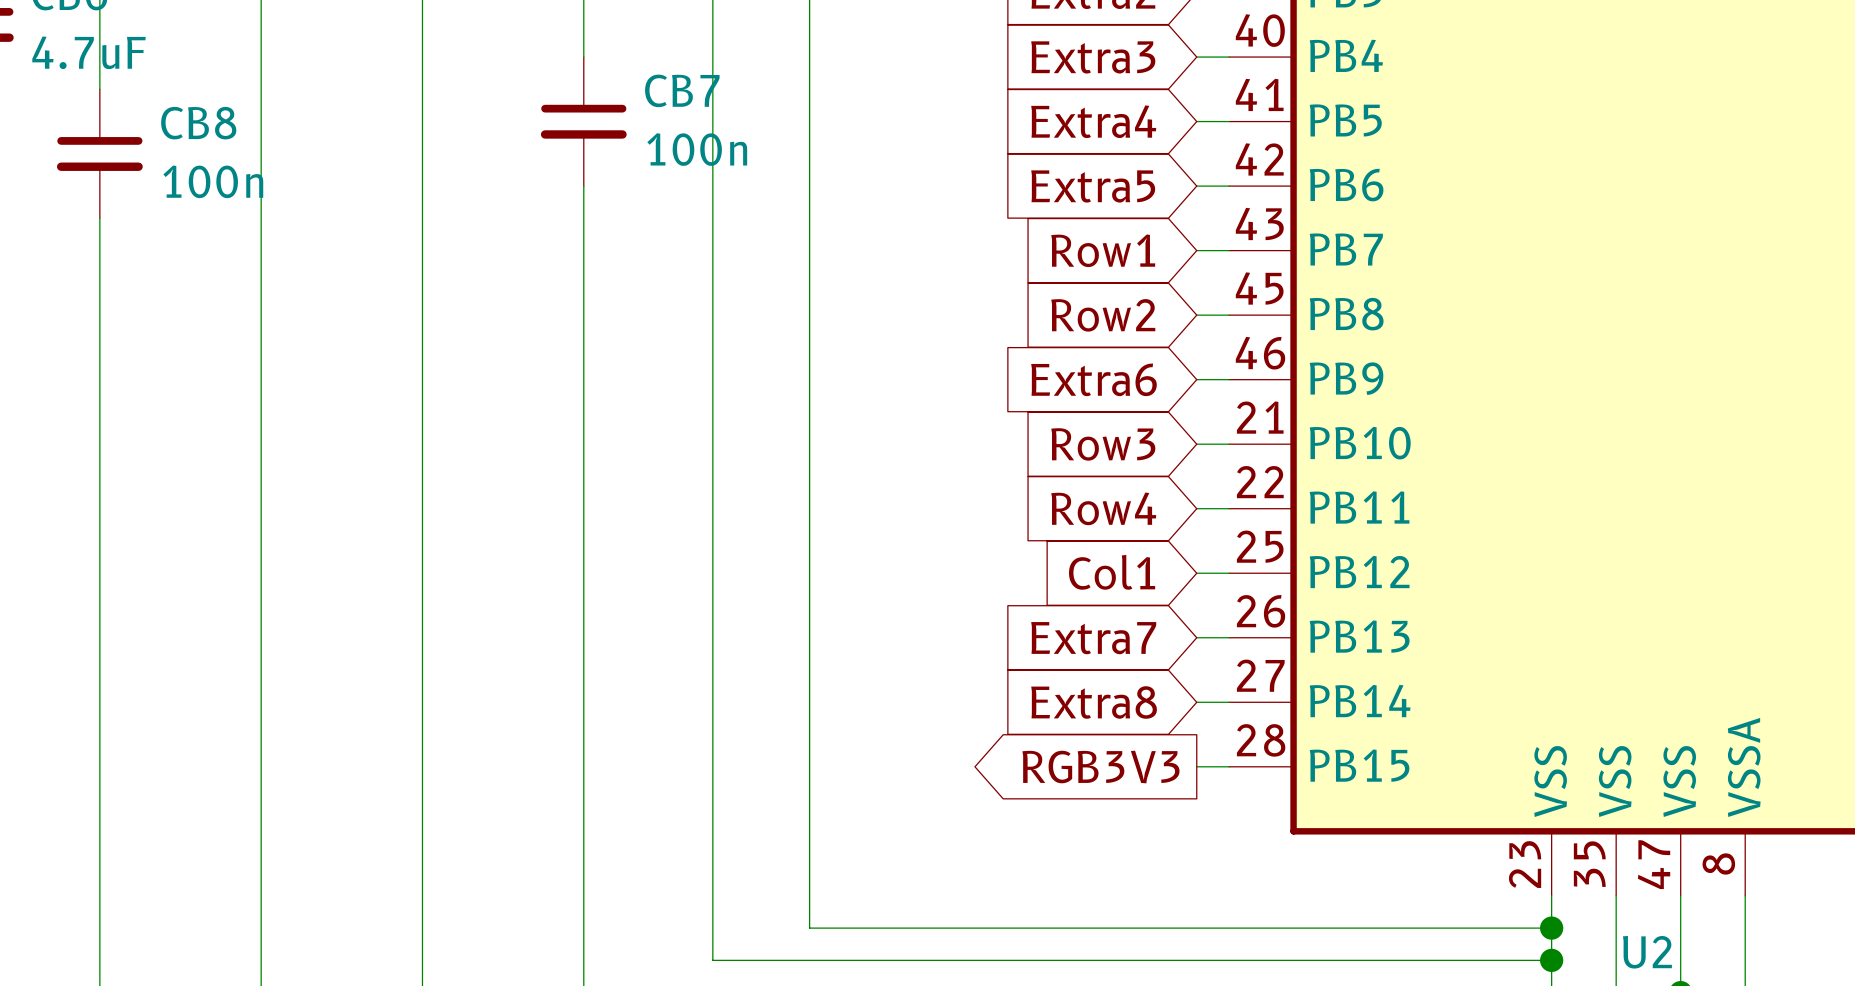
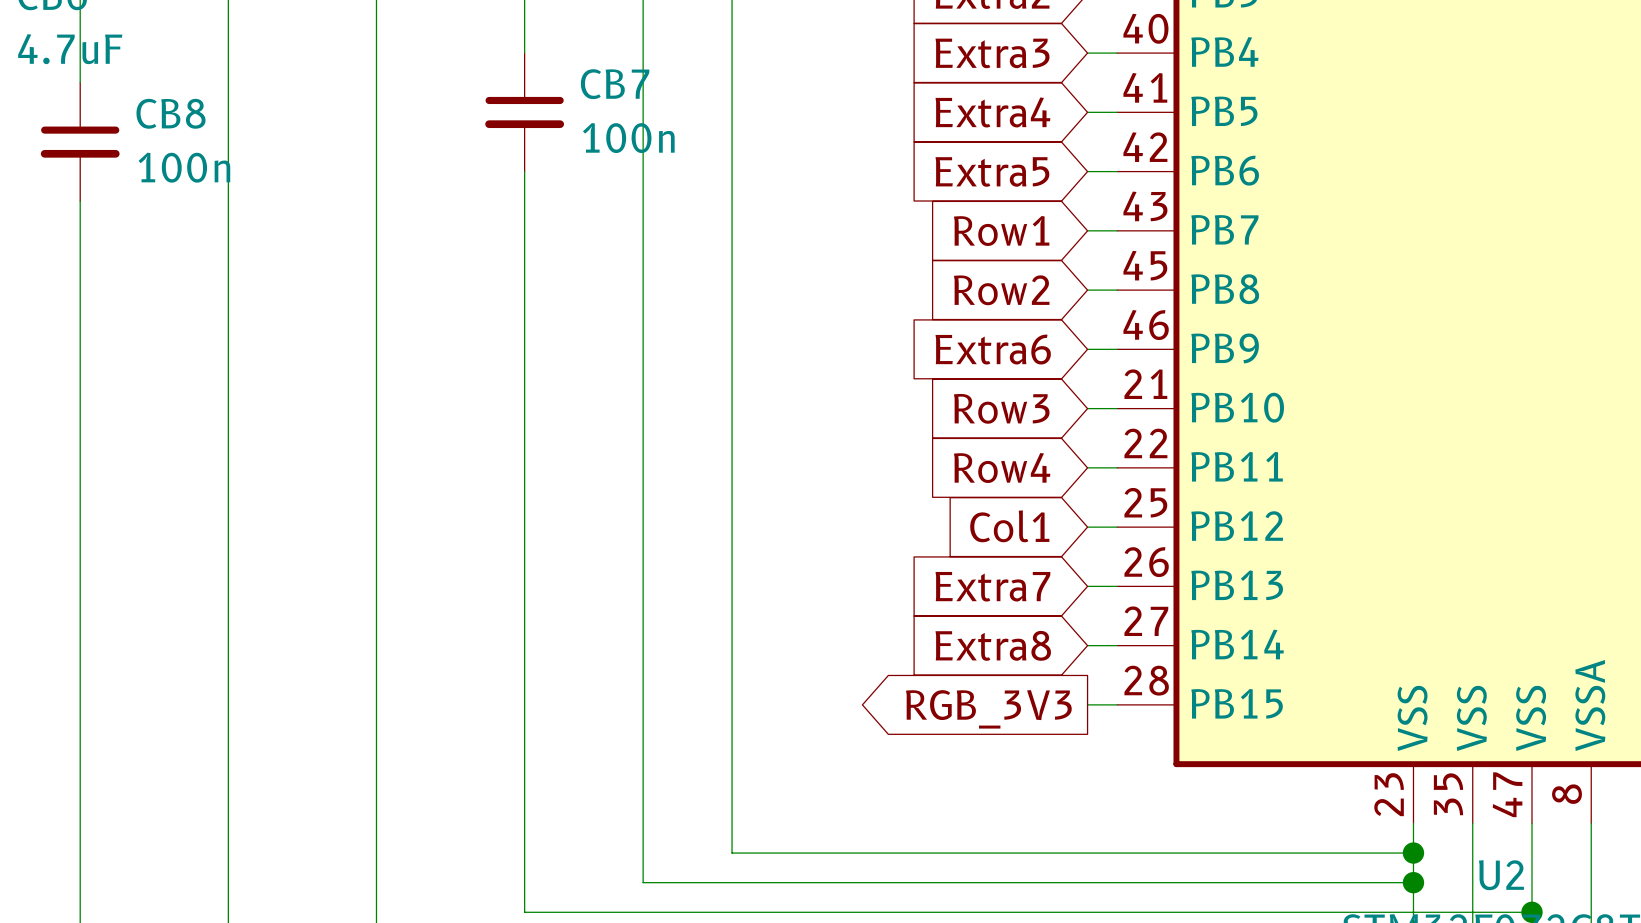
global label: RGB3V3 (1100, 767) -> RGB_3V3 (988, 709)

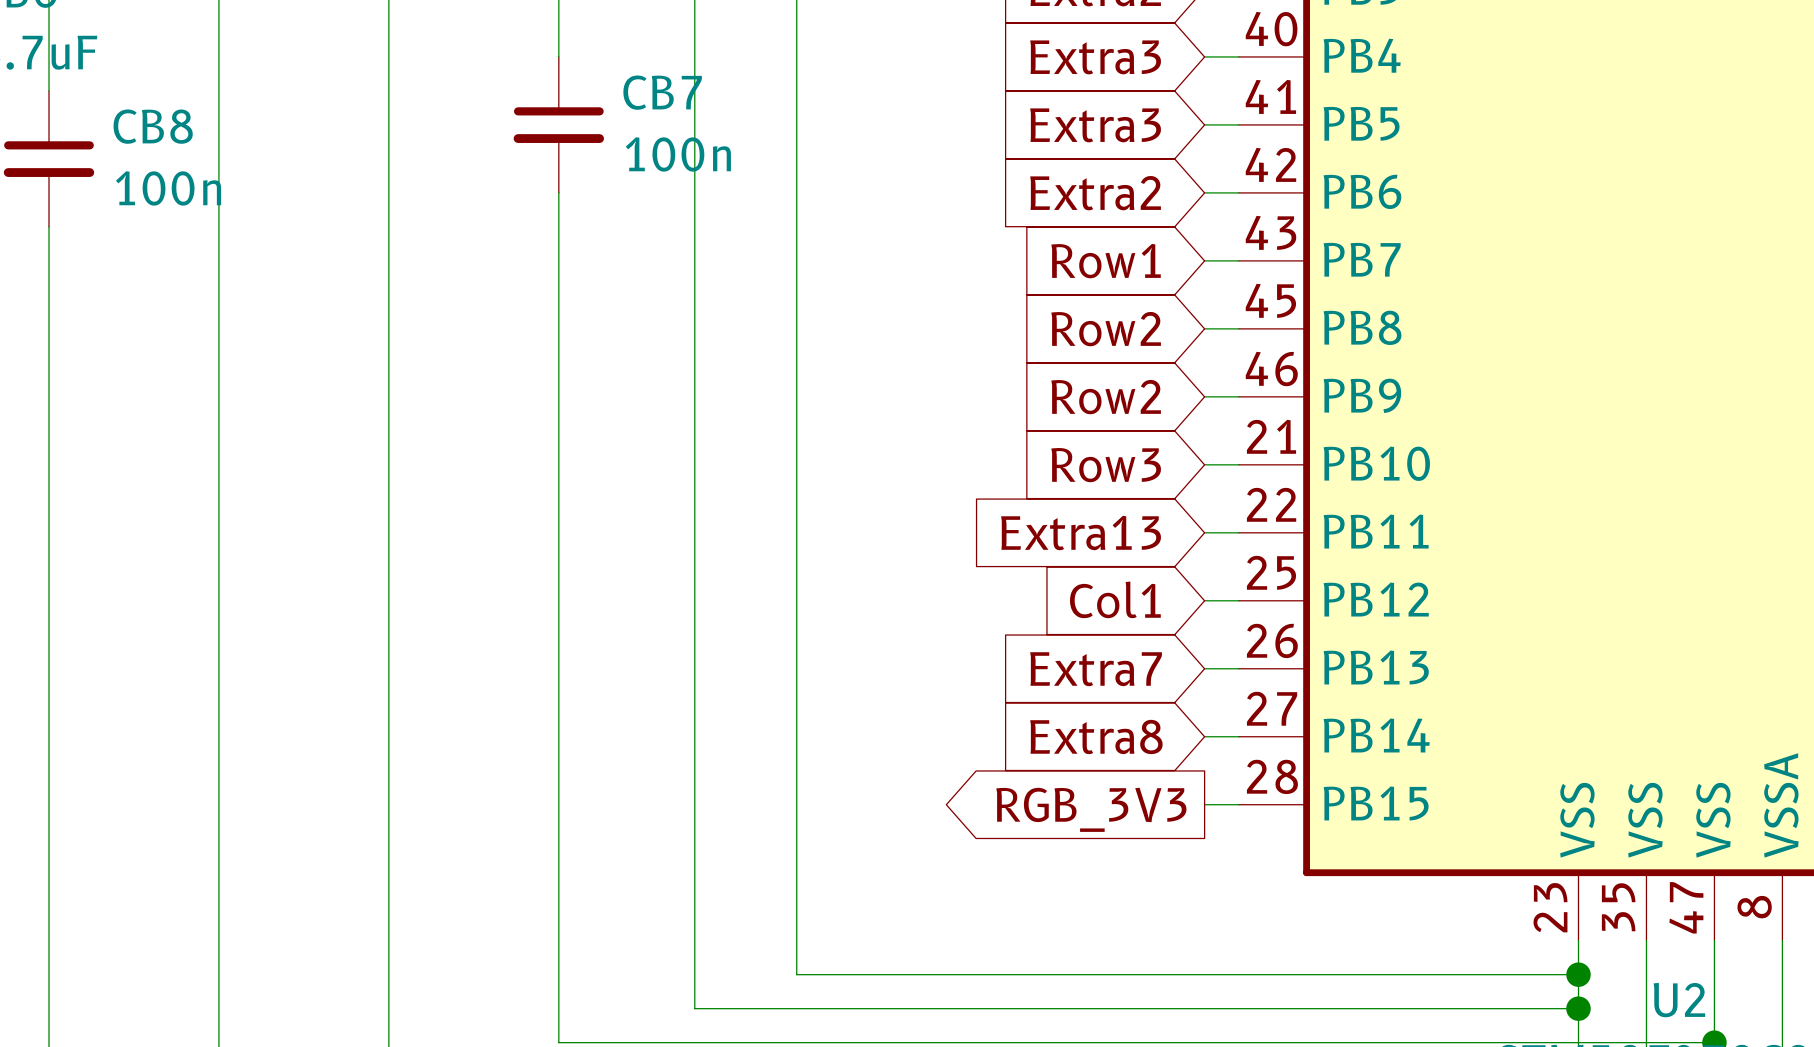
global label: Extra4 (992, 112) -> Extra3 (1095, 125)
global label: Extra5 (992, 171) -> Extra2 (1095, 193)
global label: Extra6 (993, 349) -> Row2 (1106, 397)
global label: Row4 (1002, 468) -> Extra13 (1081, 533)

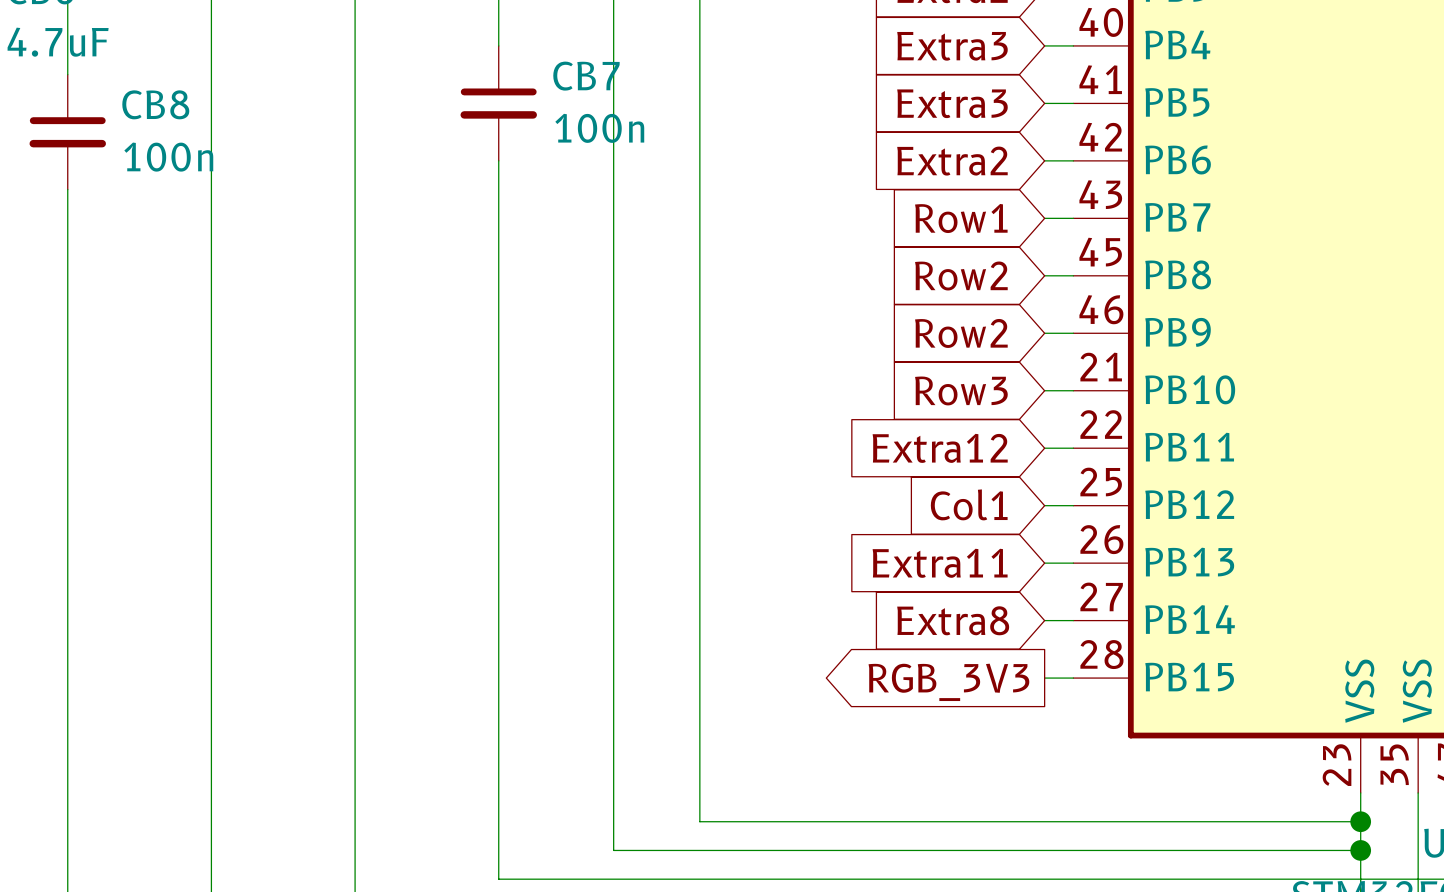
global label: Extra13 (1081, 533) -> Extra12 (940, 448)
global label: Extra7 (1096, 669) -> Extra11 (940, 563)

